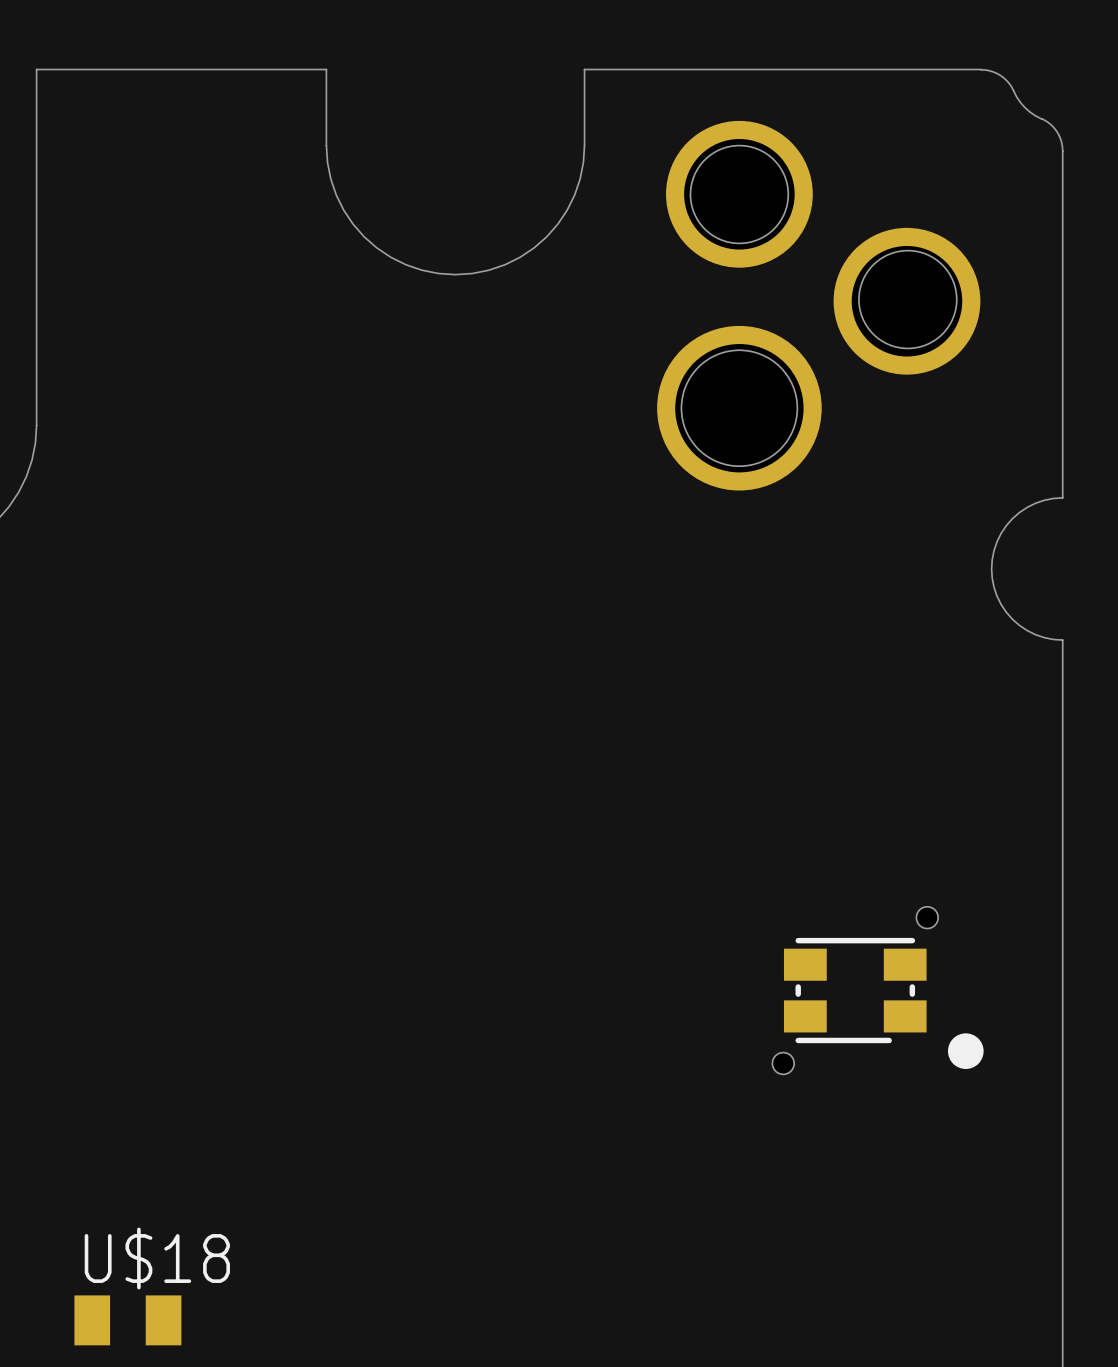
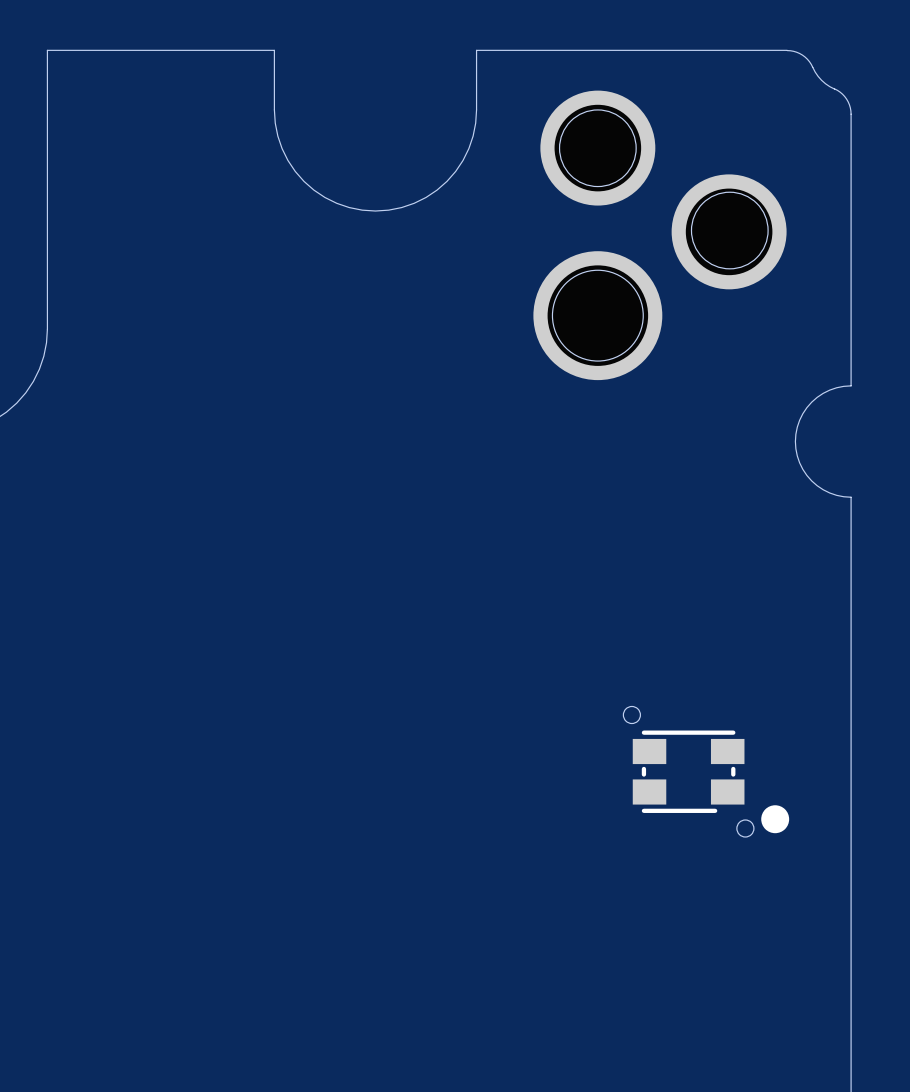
round board edge: none -> [623, 706, 641, 724]
part footprint: [772, 906, 984, 1075] -> [632, 730, 790, 834]
round board edge: none -> [736, 819, 755, 838]
U$18: (127, 1320) -> none

